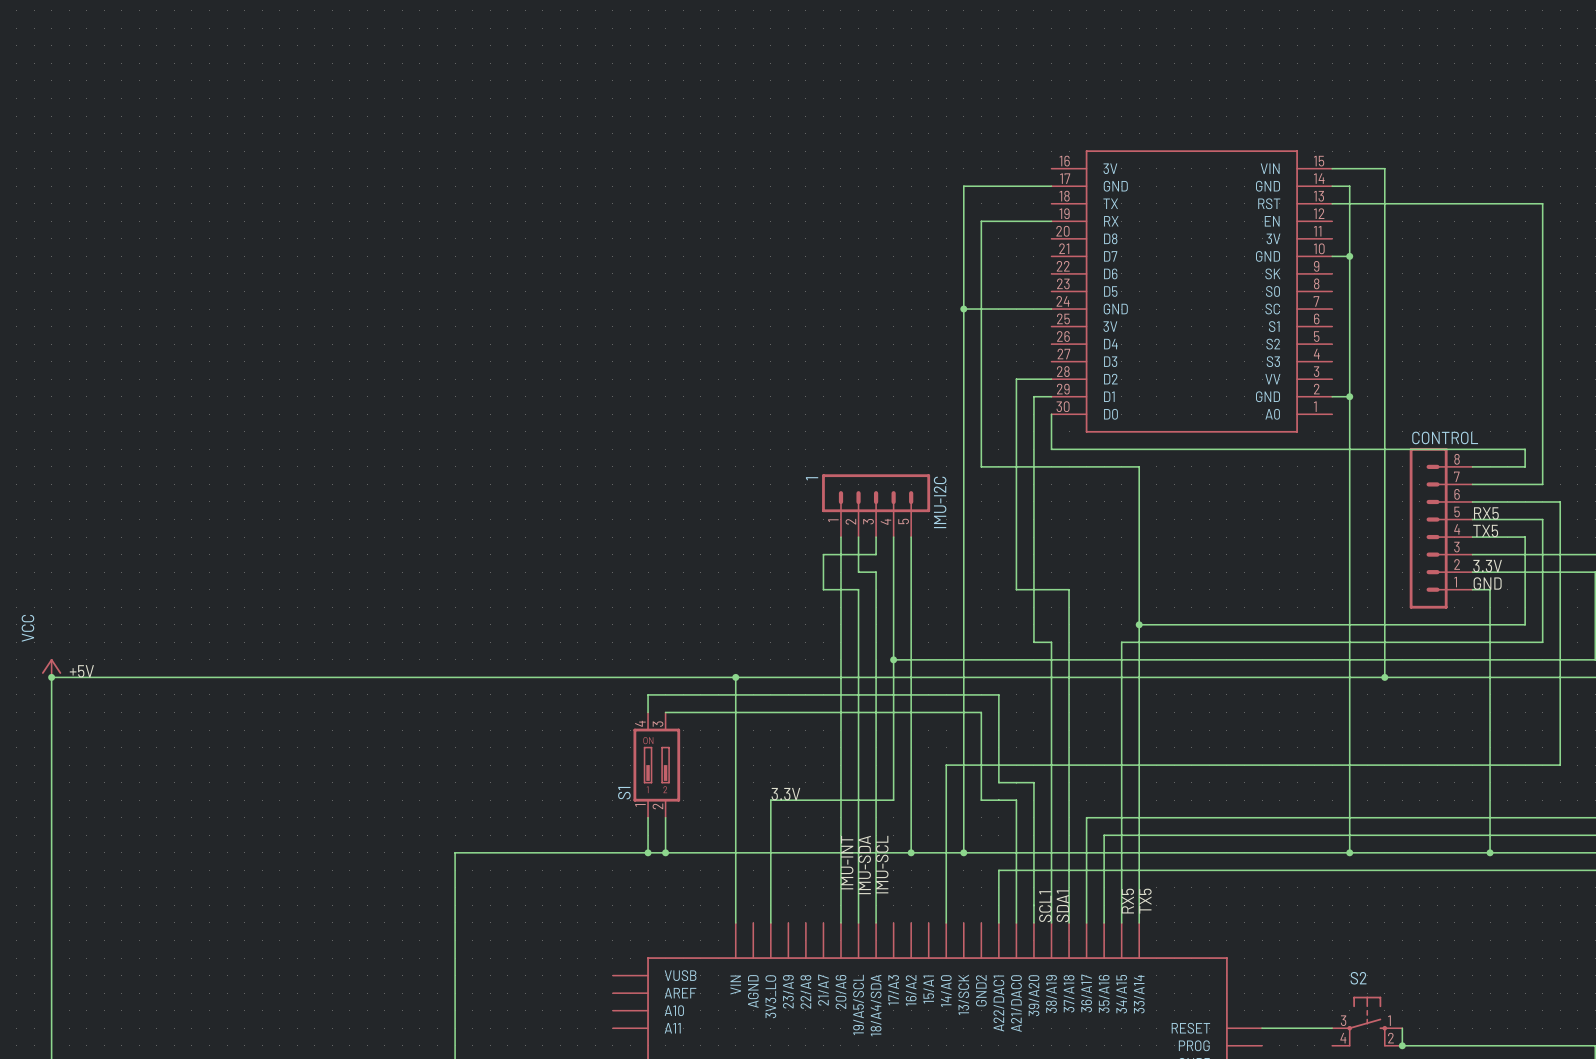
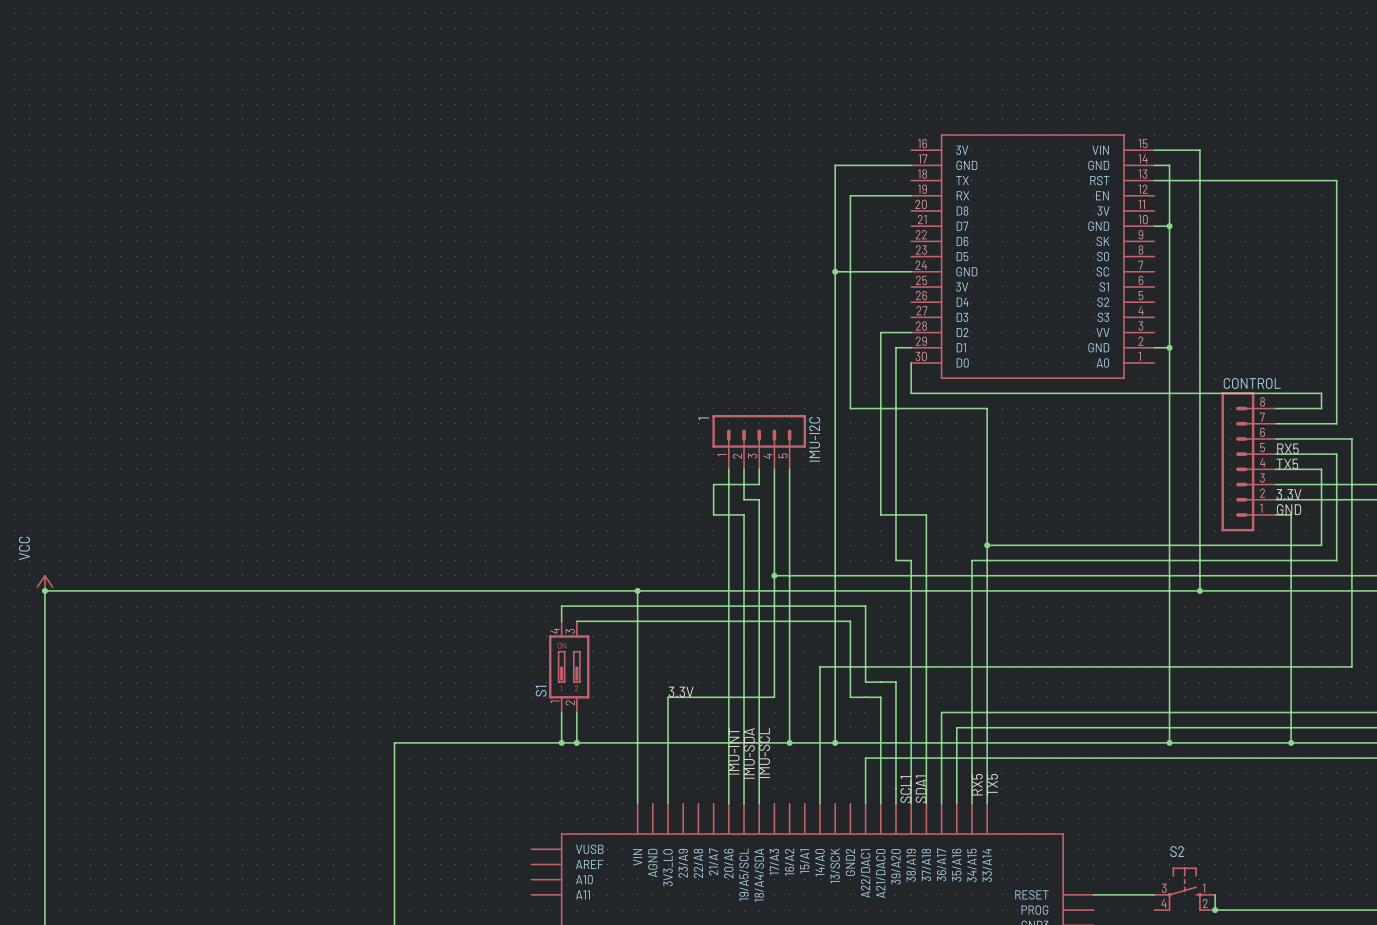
label: +5V (81, 671) -> none

